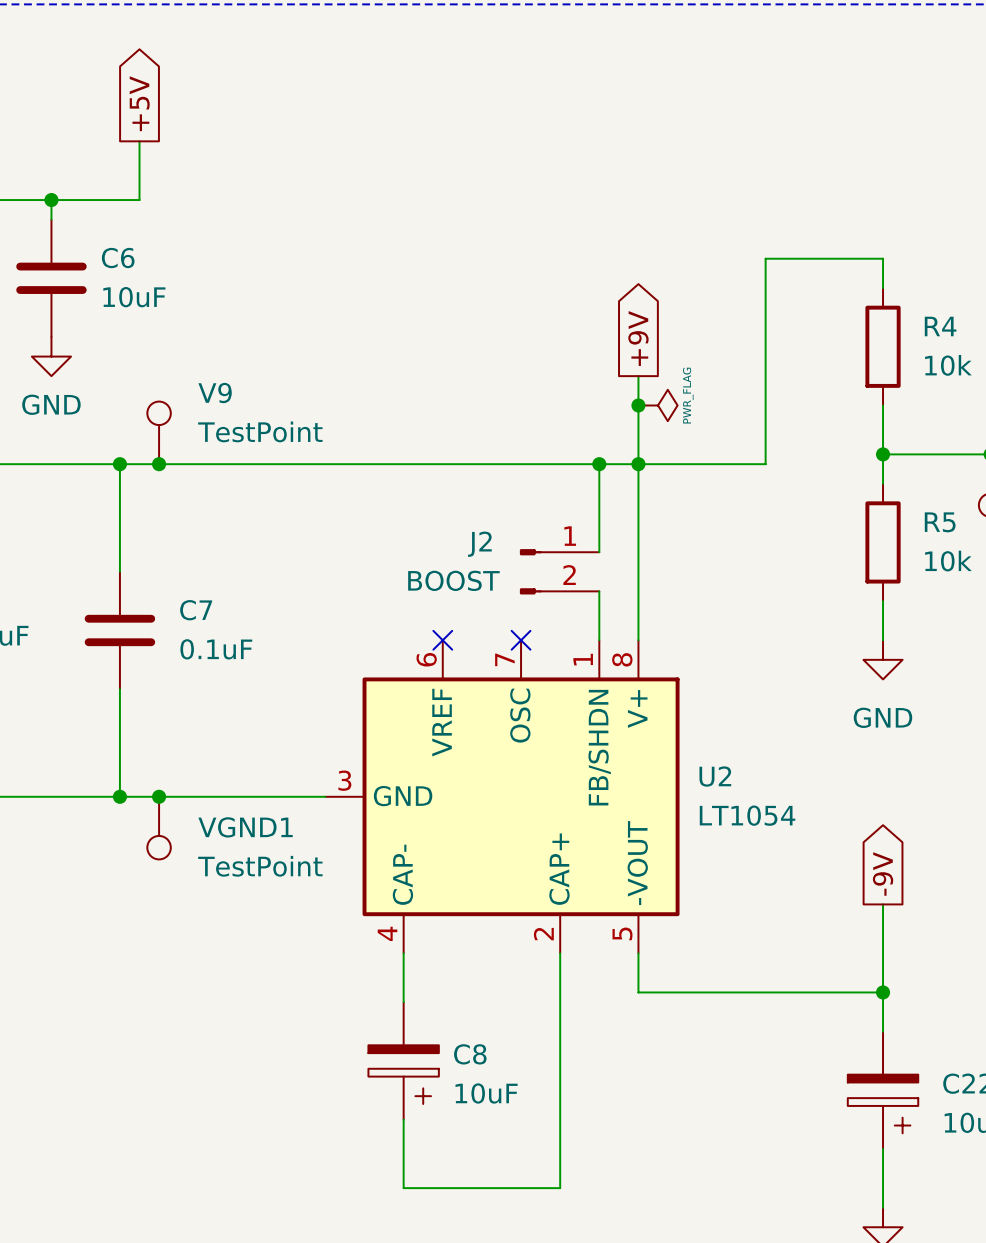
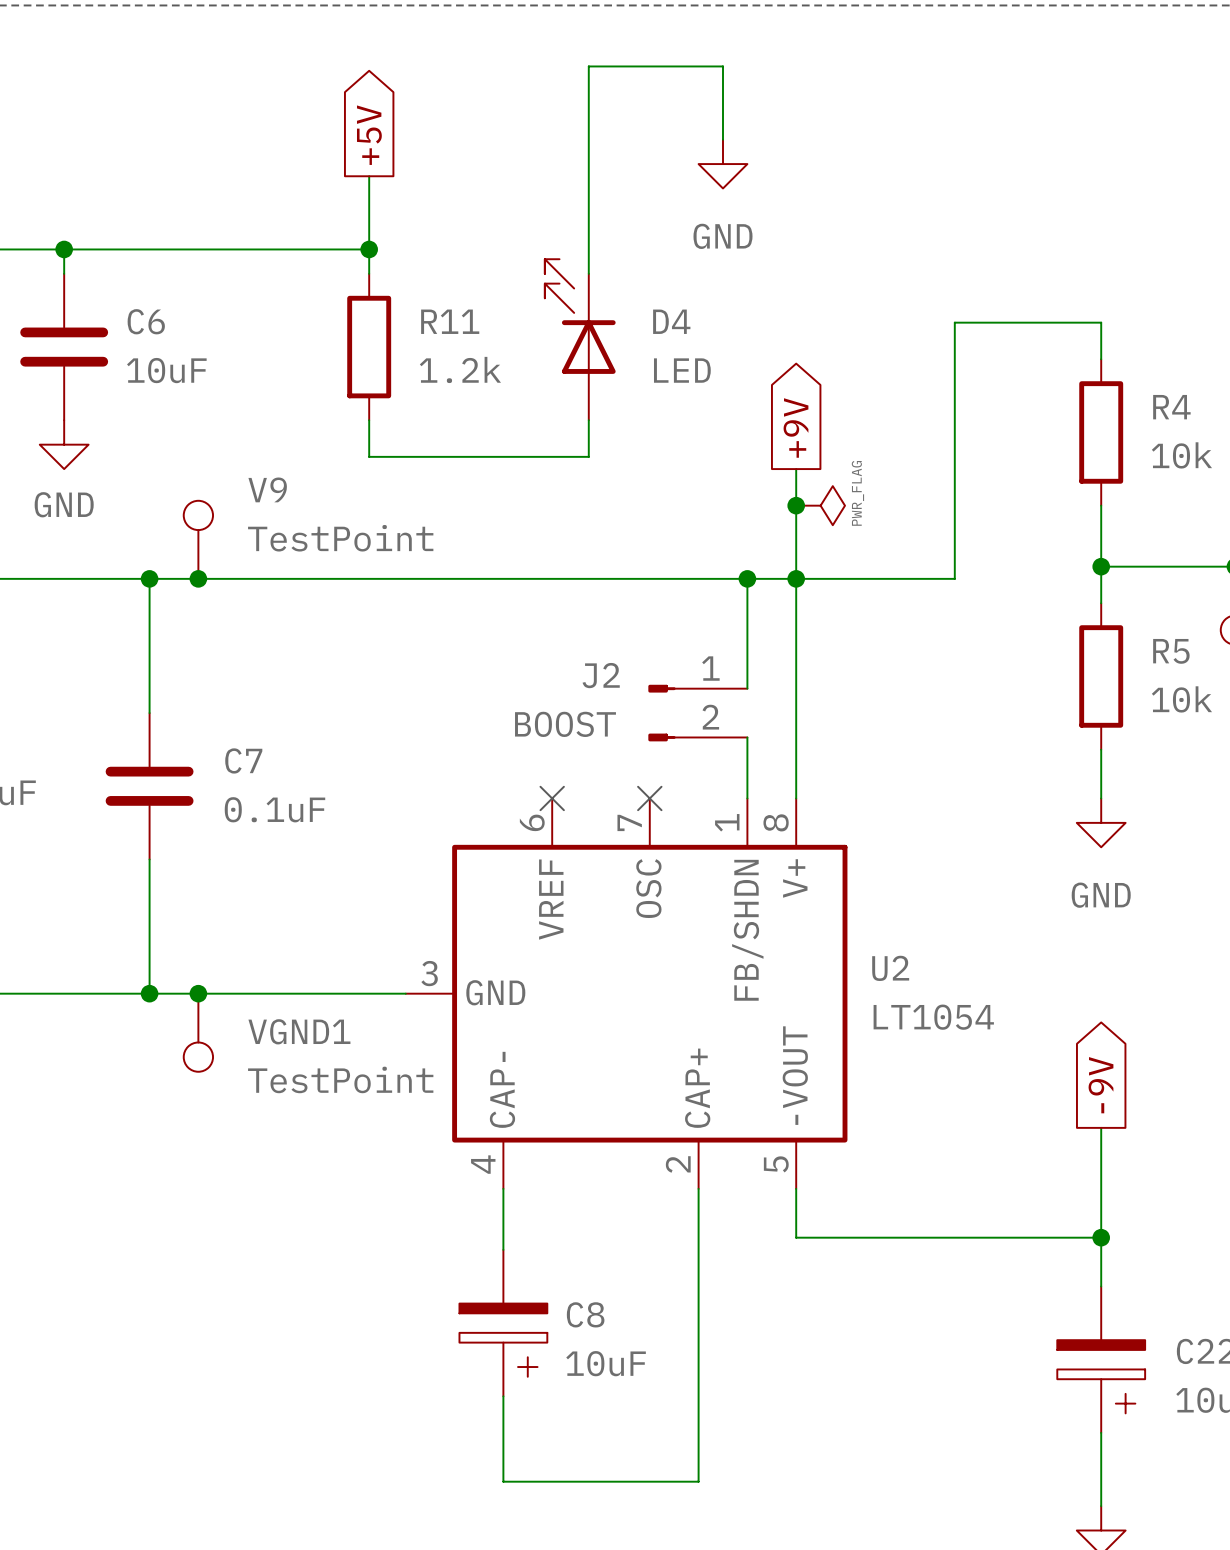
global label position: +5V (139, 103) -> +5V (369, 135)
wire: none -> (723, 139) (723, 66) (588, 66) (588, 273)
power symbol: none -> GND (723, 164)
wire: (139, 141) (139, 200) -> (369, 249) (173, 249)
wire: none -> (369, 176) (369, 273)
junction: none -> (369, 249)
D4: none -> LED (580, 339)
R11: none -> 1.2k (369, 347)
wire: none -> (369, 420) (369, 456) (588, 456) (588, 420)

